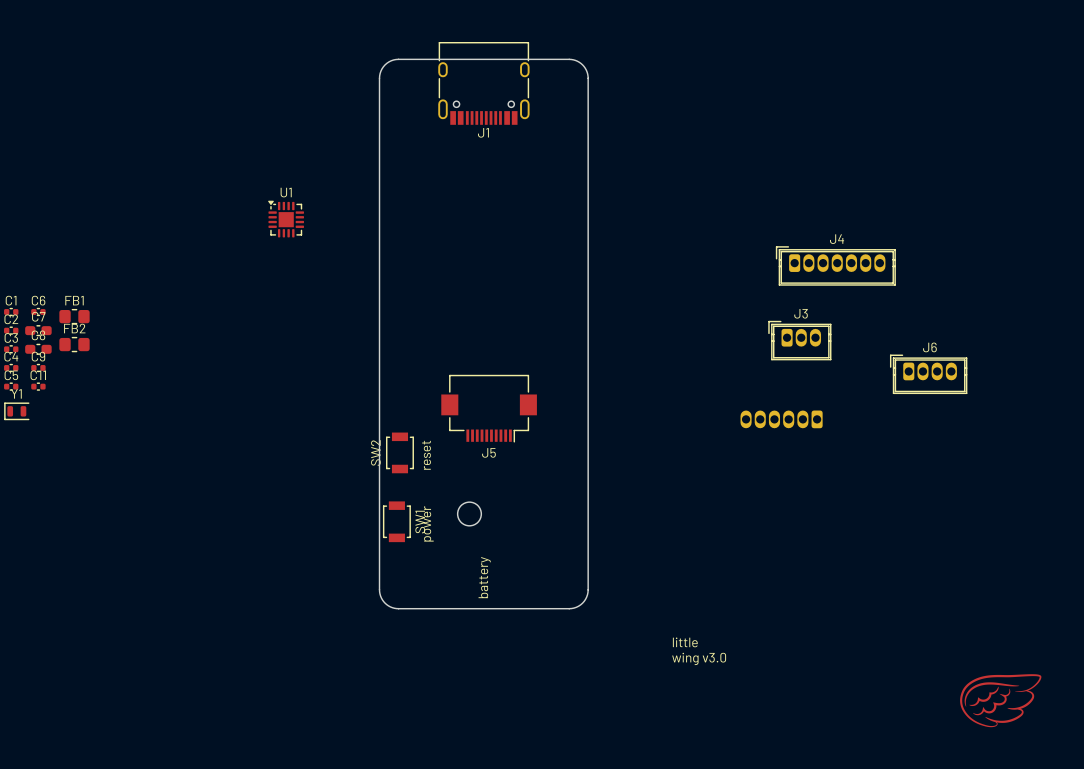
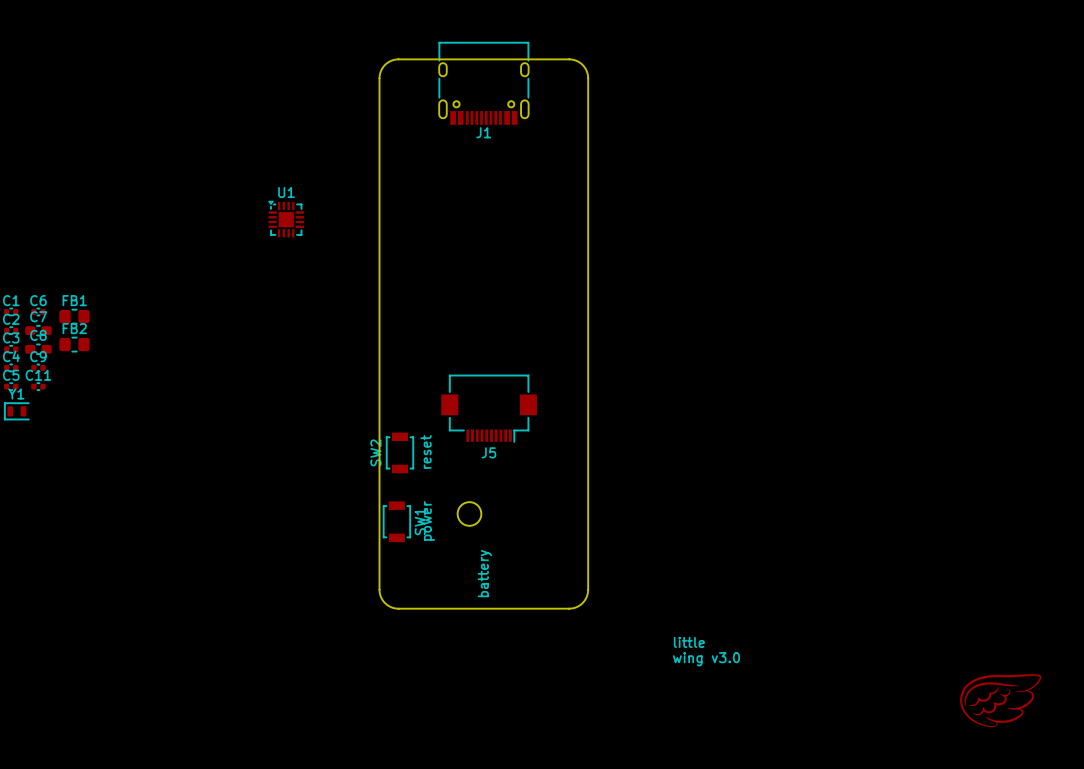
J4: (835, 265) -> none
J3: (799, 340) -> none
J6: (928, 374) -> none
part: (781, 419) -> none

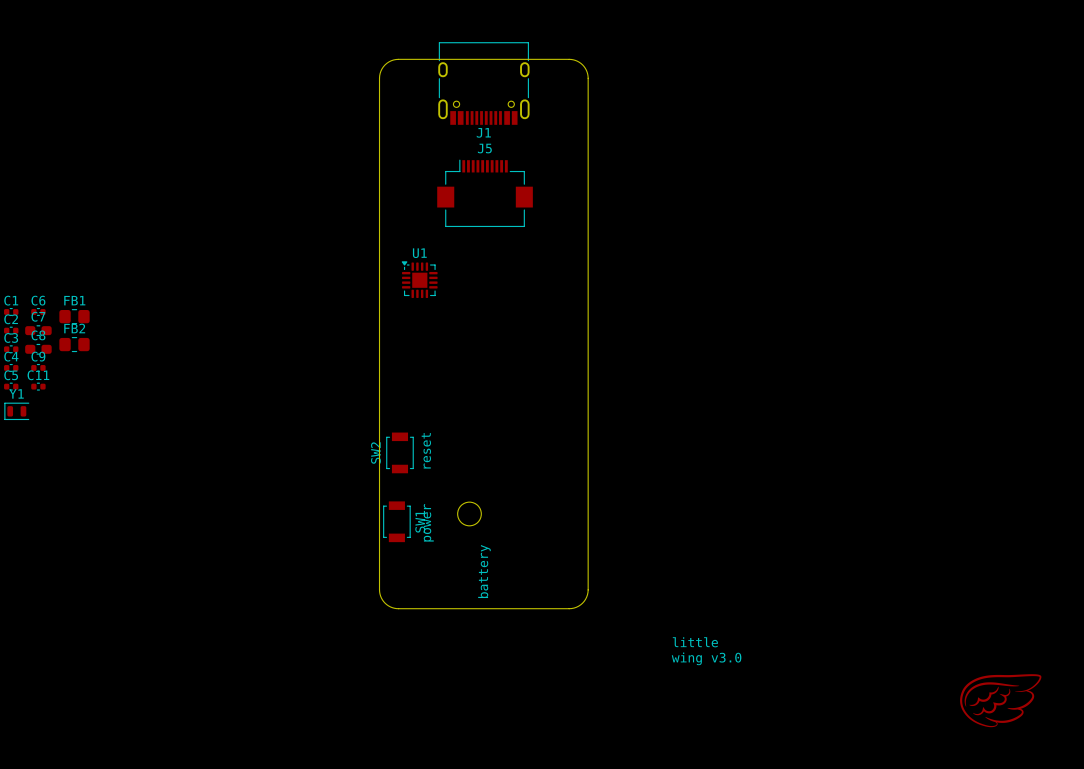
U1 position: (286, 219) -> (419, 279)
J5 rotation: 0° (489, 408) -> 180° (485, 193)
J5 position: (489, 408) -> (485, 193)

